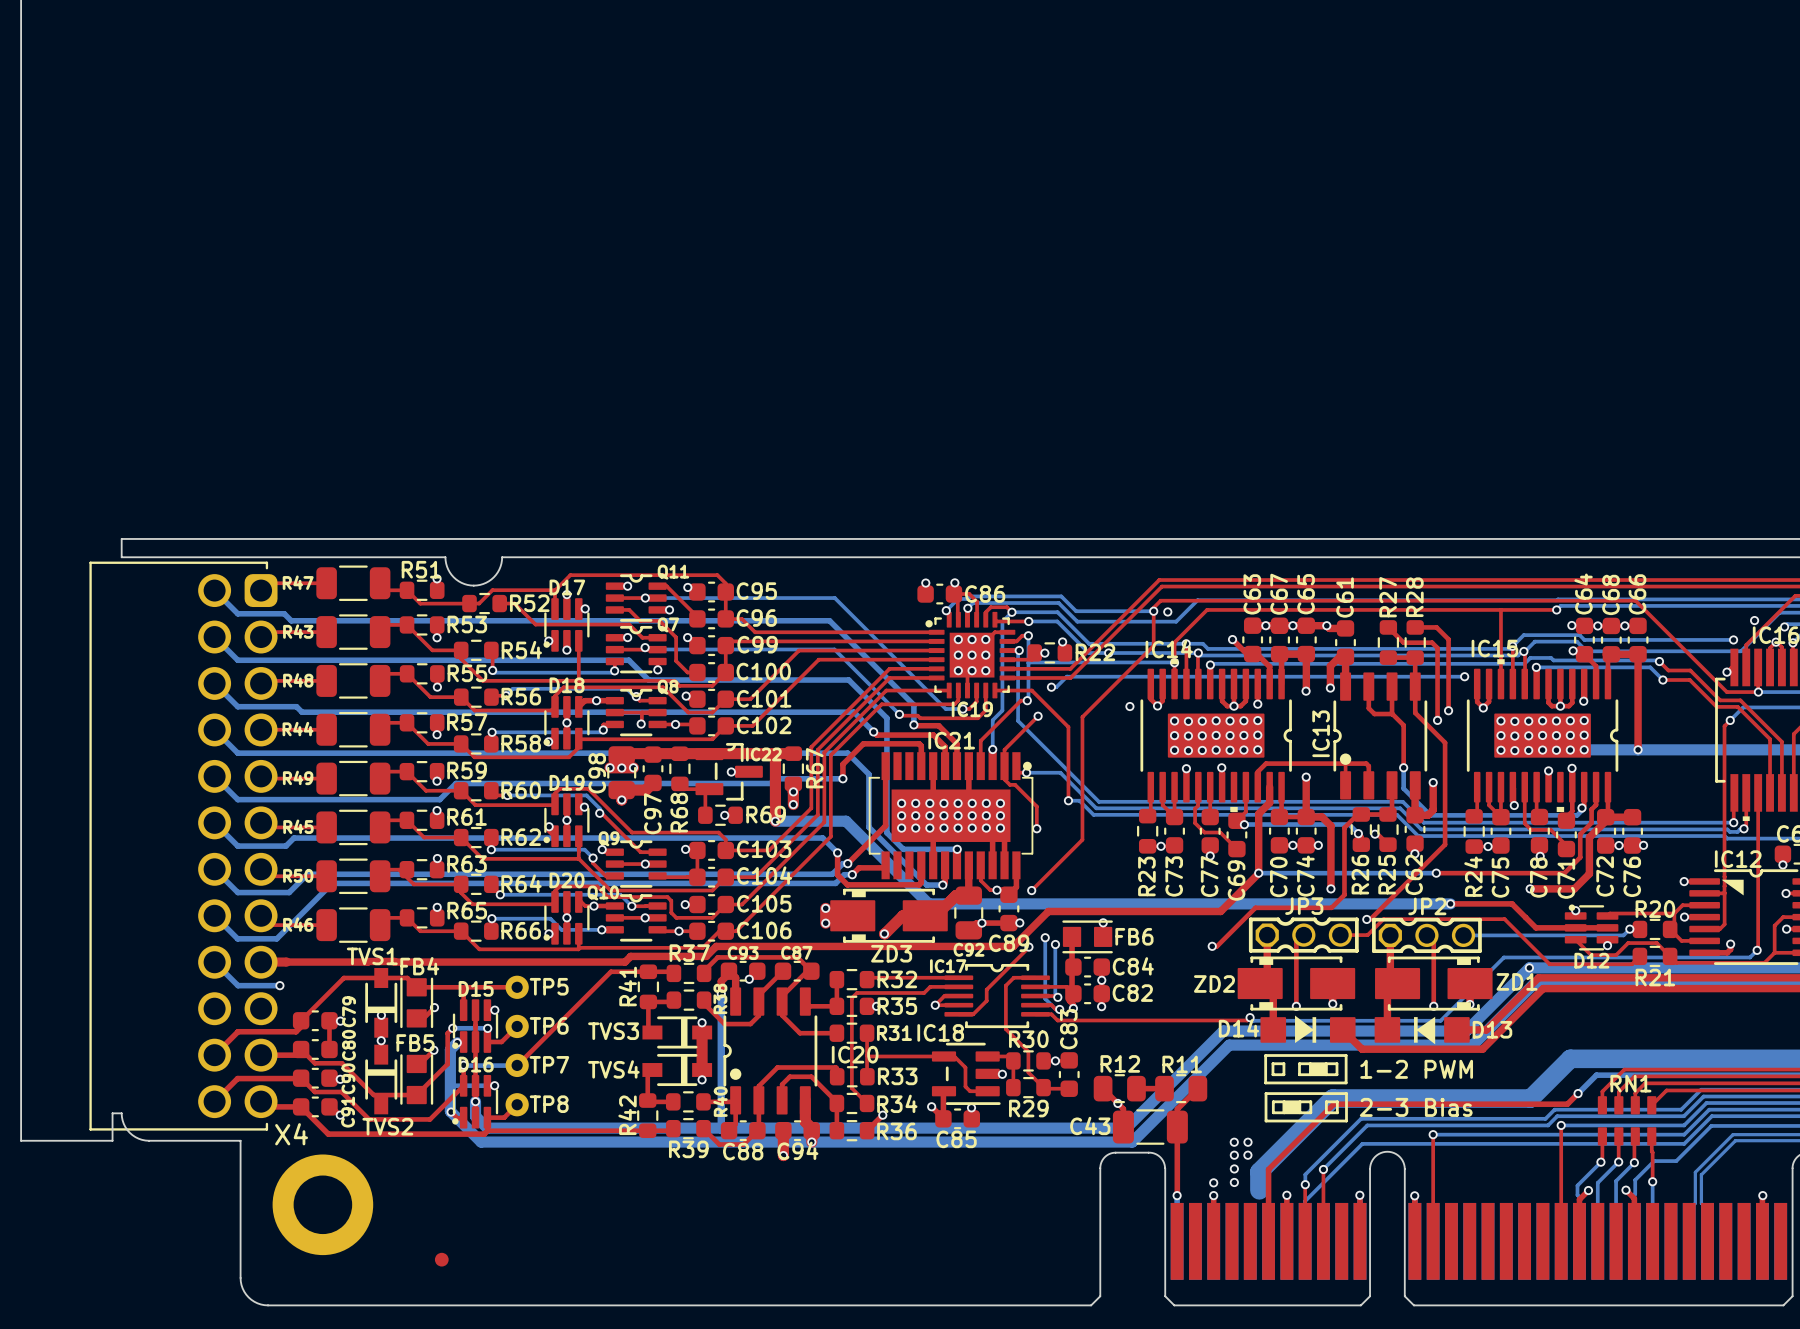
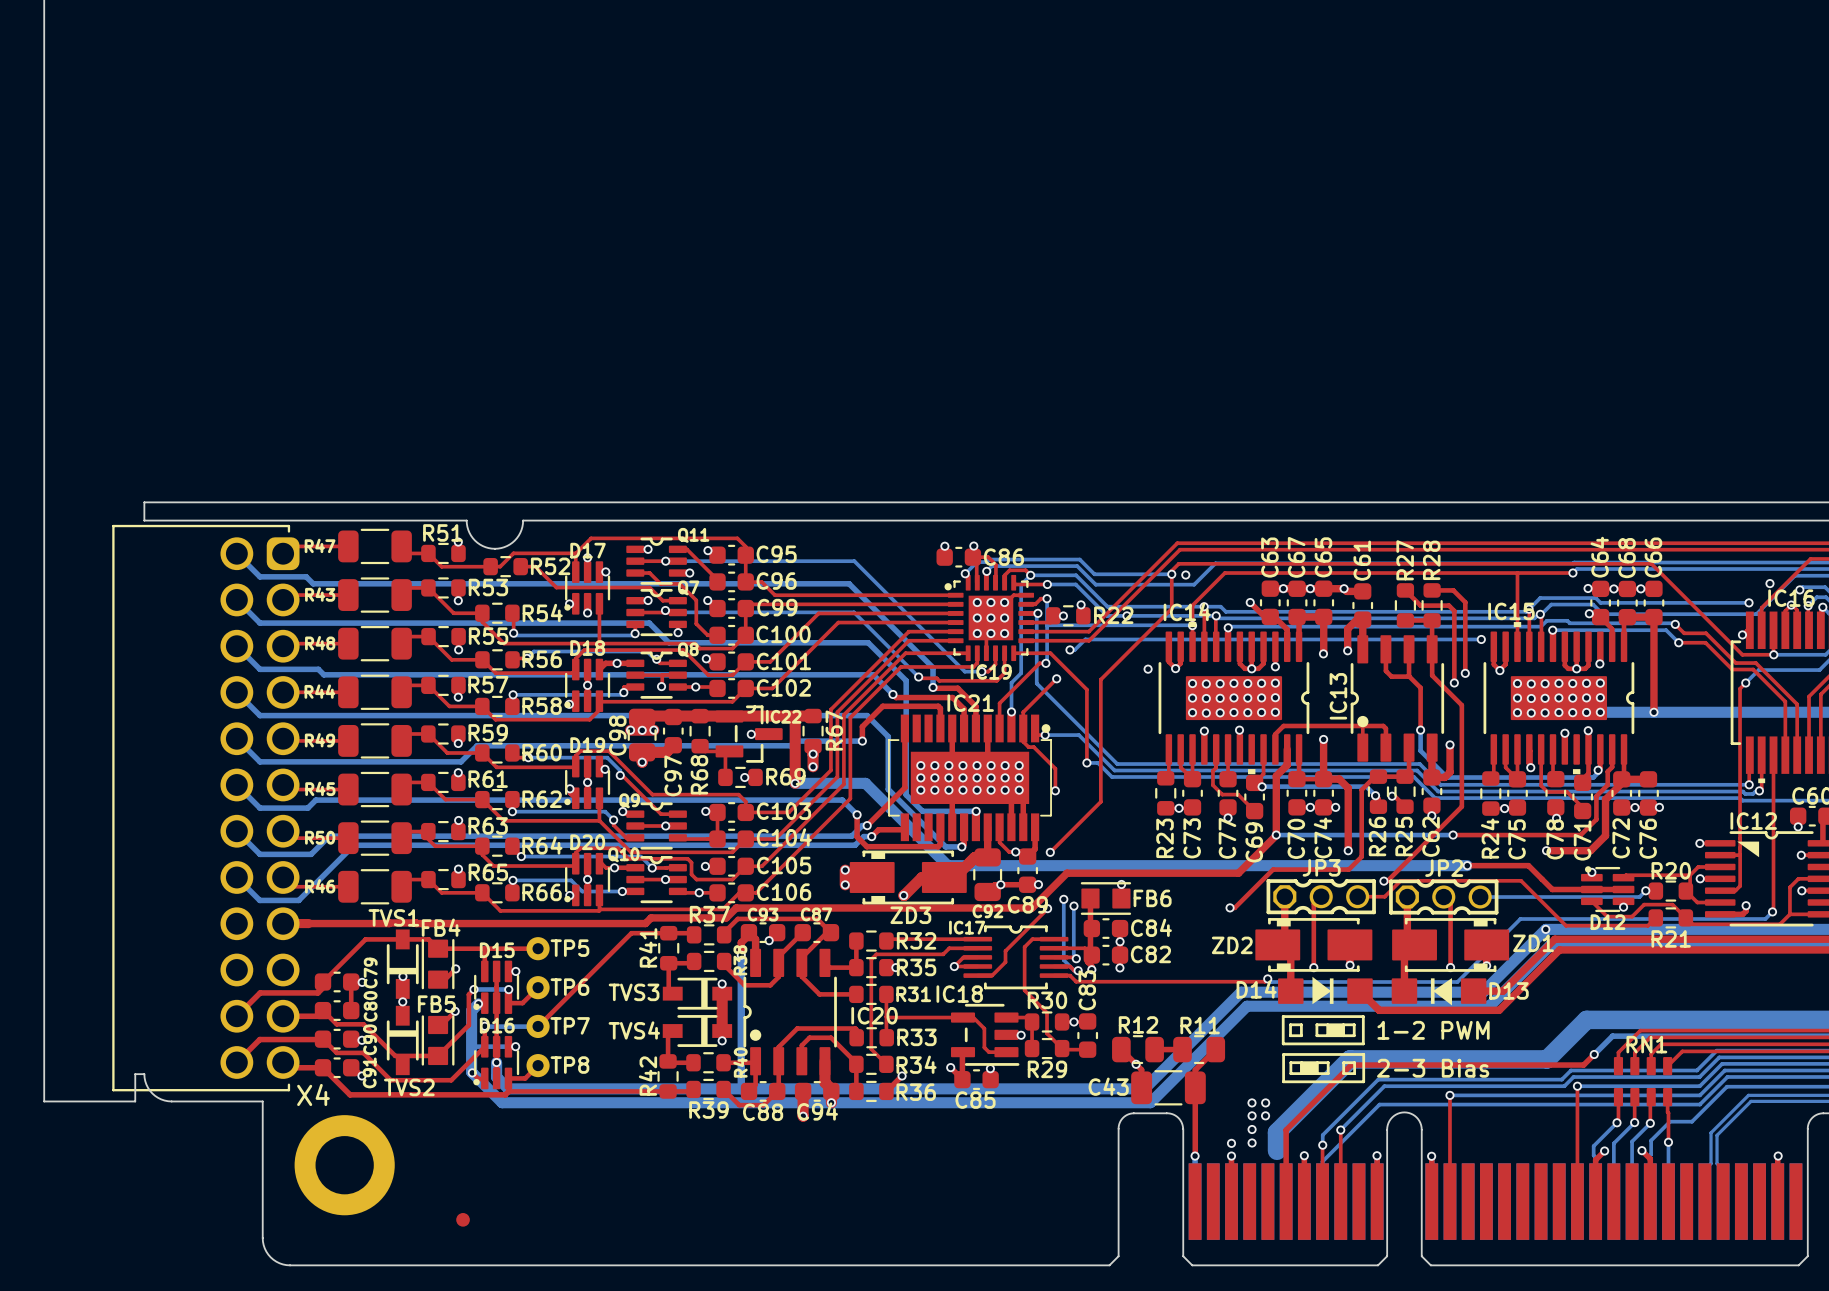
bottom track: (214, 962) (238, 985) (279, 985) -> none
via: (279, 985) -> none

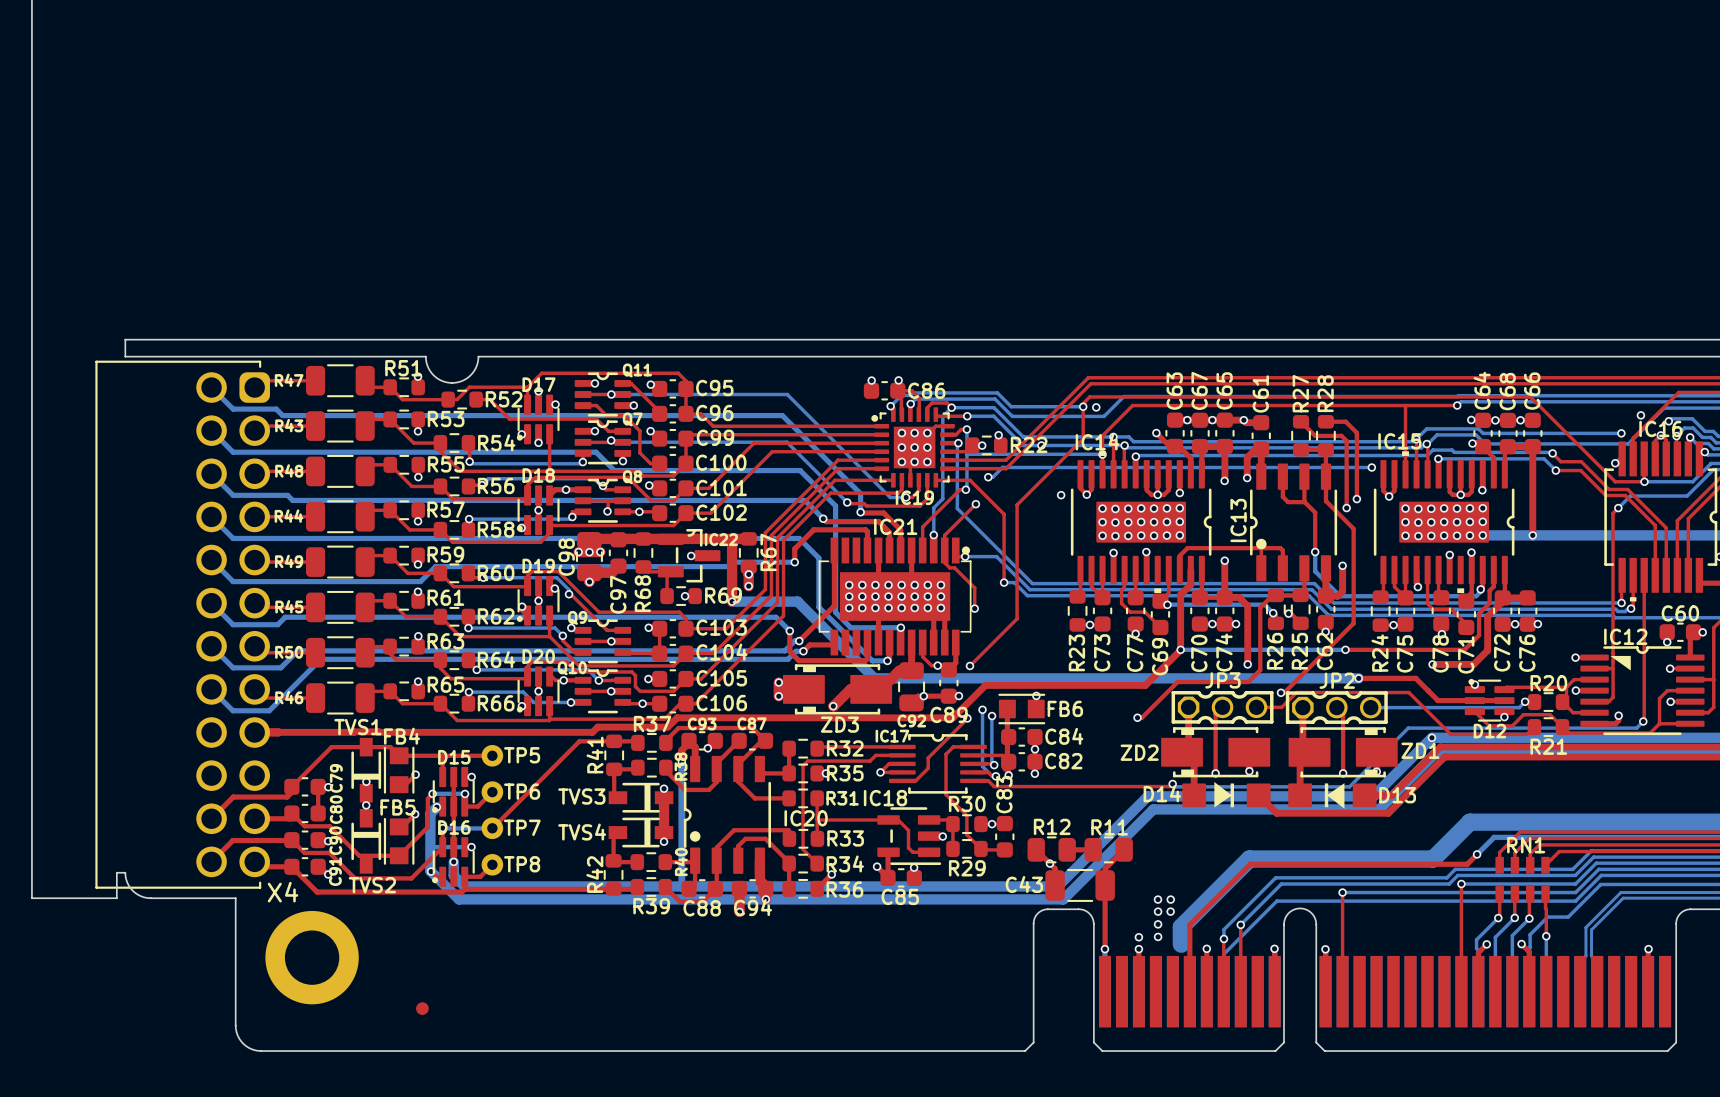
line: (1283, 1016) (1363, 1016) (1363, 1043) (1283, 1043) (1283, 1016) -> none
drawing: [1326, 1023, 1345, 1038] -> none
line: (1290, 1024) (1301, 1024) (1301, 1035) (1290, 1035) (1290, 1024) -> none
line: (1316, 1024) (1327, 1024) (1327, 1035) (1316, 1035) (1316, 1024) -> none
line: (1343, 1024) (1354, 1024) (1354, 1035) (1343, 1035) (1343, 1024) -> none
text: 1-2 PWM (1433, 1030) -> none
line: (1283, 1054) (1363, 1054) (1363, 1081) (1283, 1081) (1283, 1054) -> none
drawing: [1300, 1061, 1319, 1075] -> none
line: (1290, 1062) (1301, 1062) (1301, 1073) (1290, 1073) (1290, 1062) -> none
line: (1317, 1062) (1328, 1062) (1328, 1073) (1317, 1073) (1317, 1062) -> none
line: (1343, 1062) (1354, 1062) (1354, 1073) (1343, 1073) (1343, 1062) -> none
text: 2-3 Bias (1433, 1068) -> none

